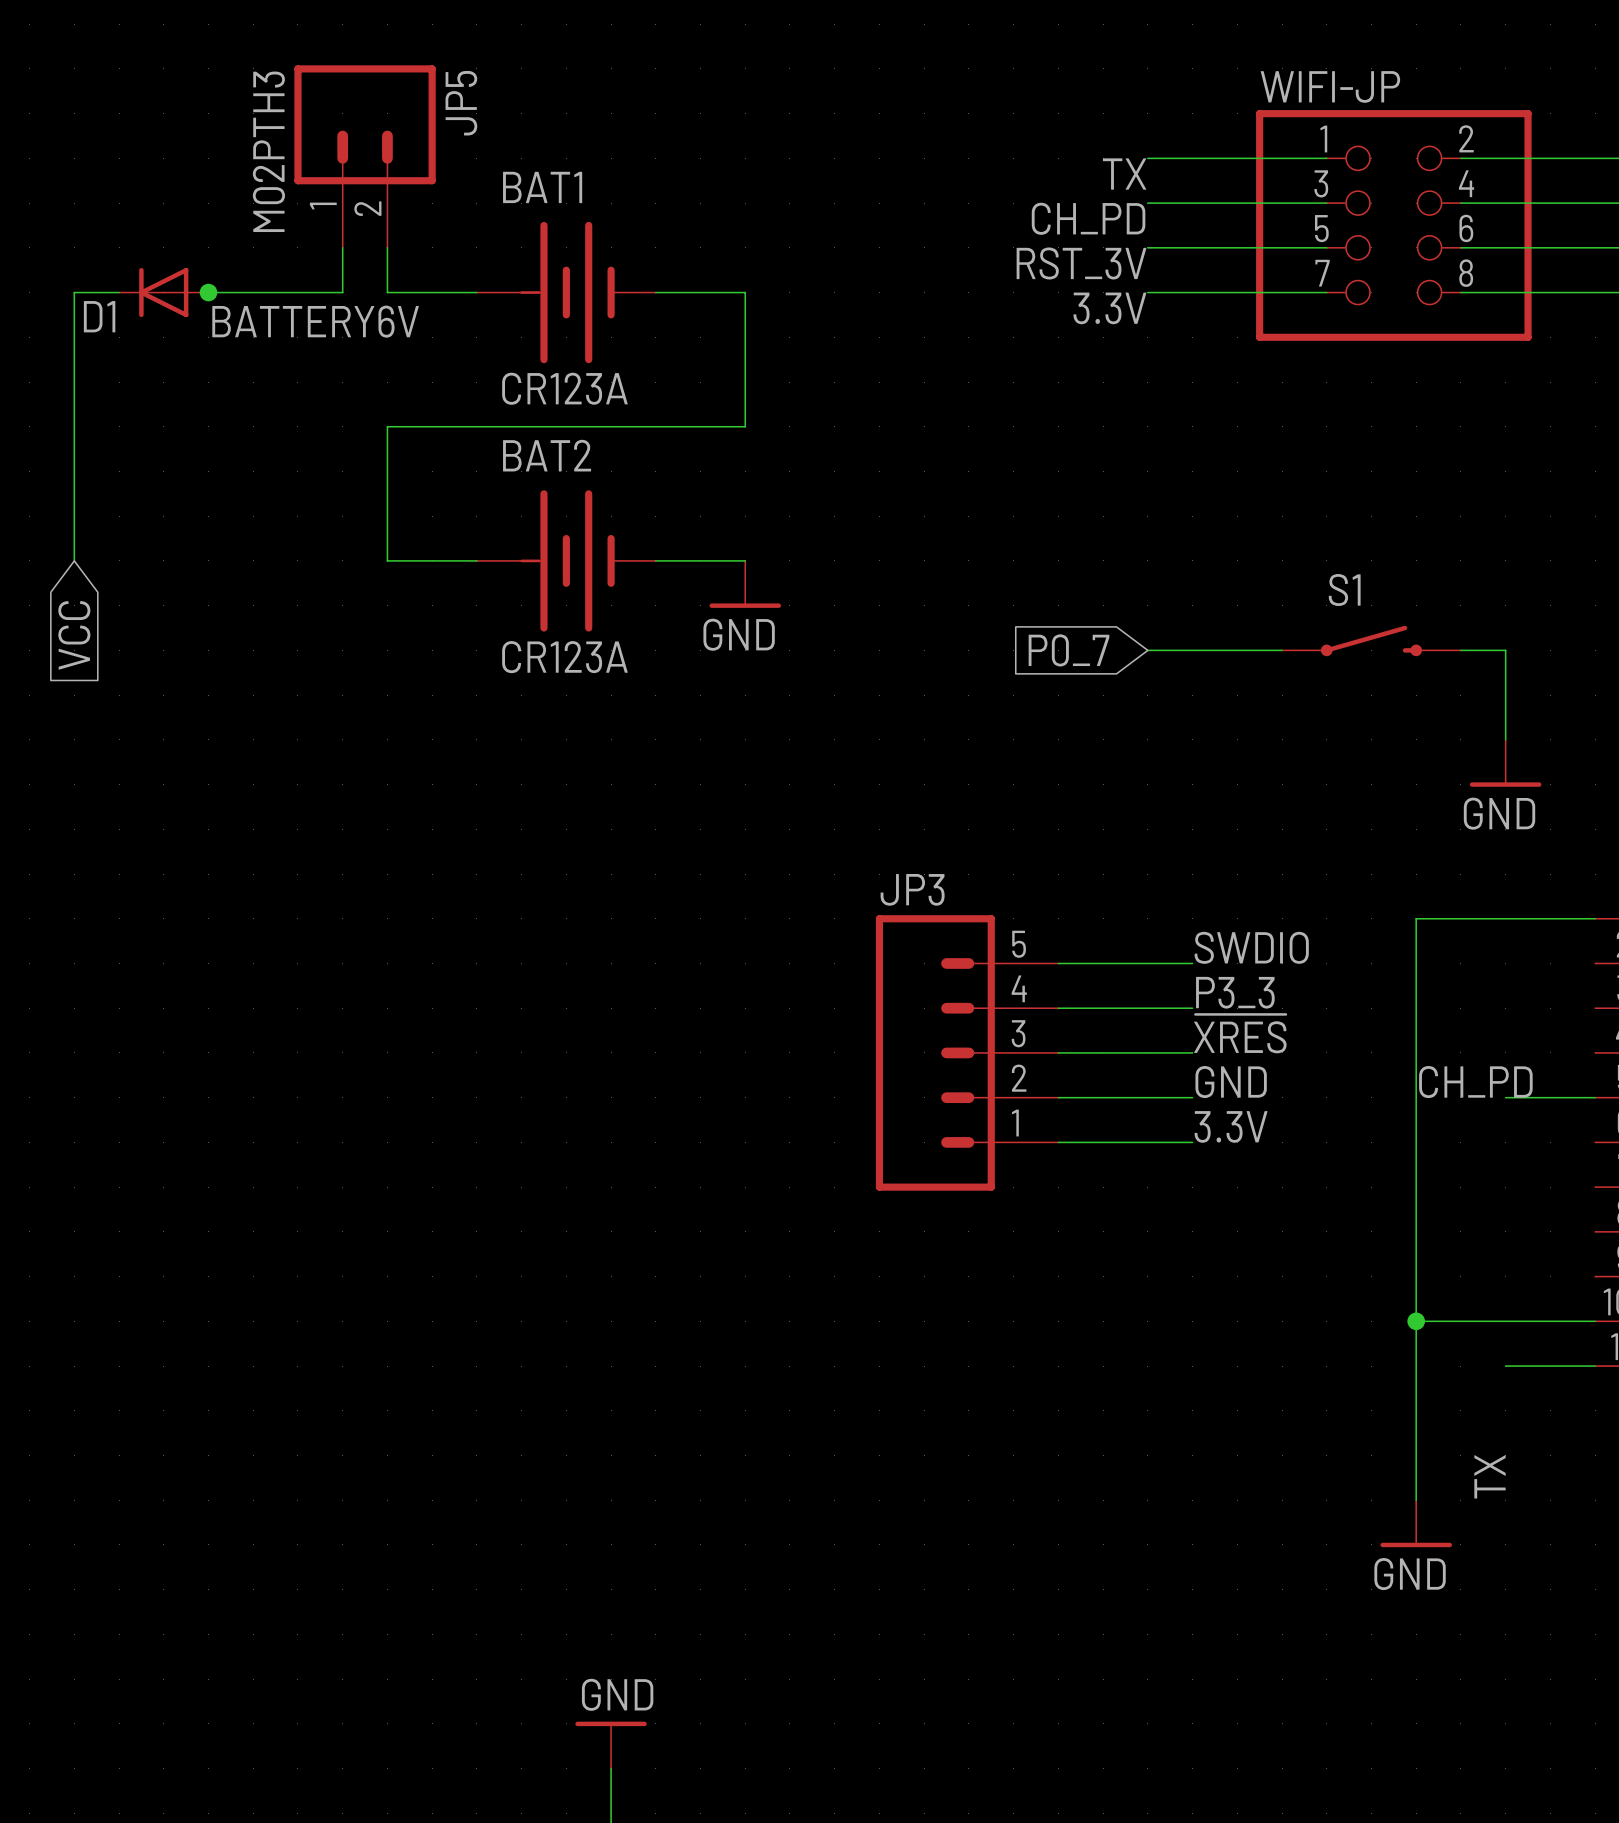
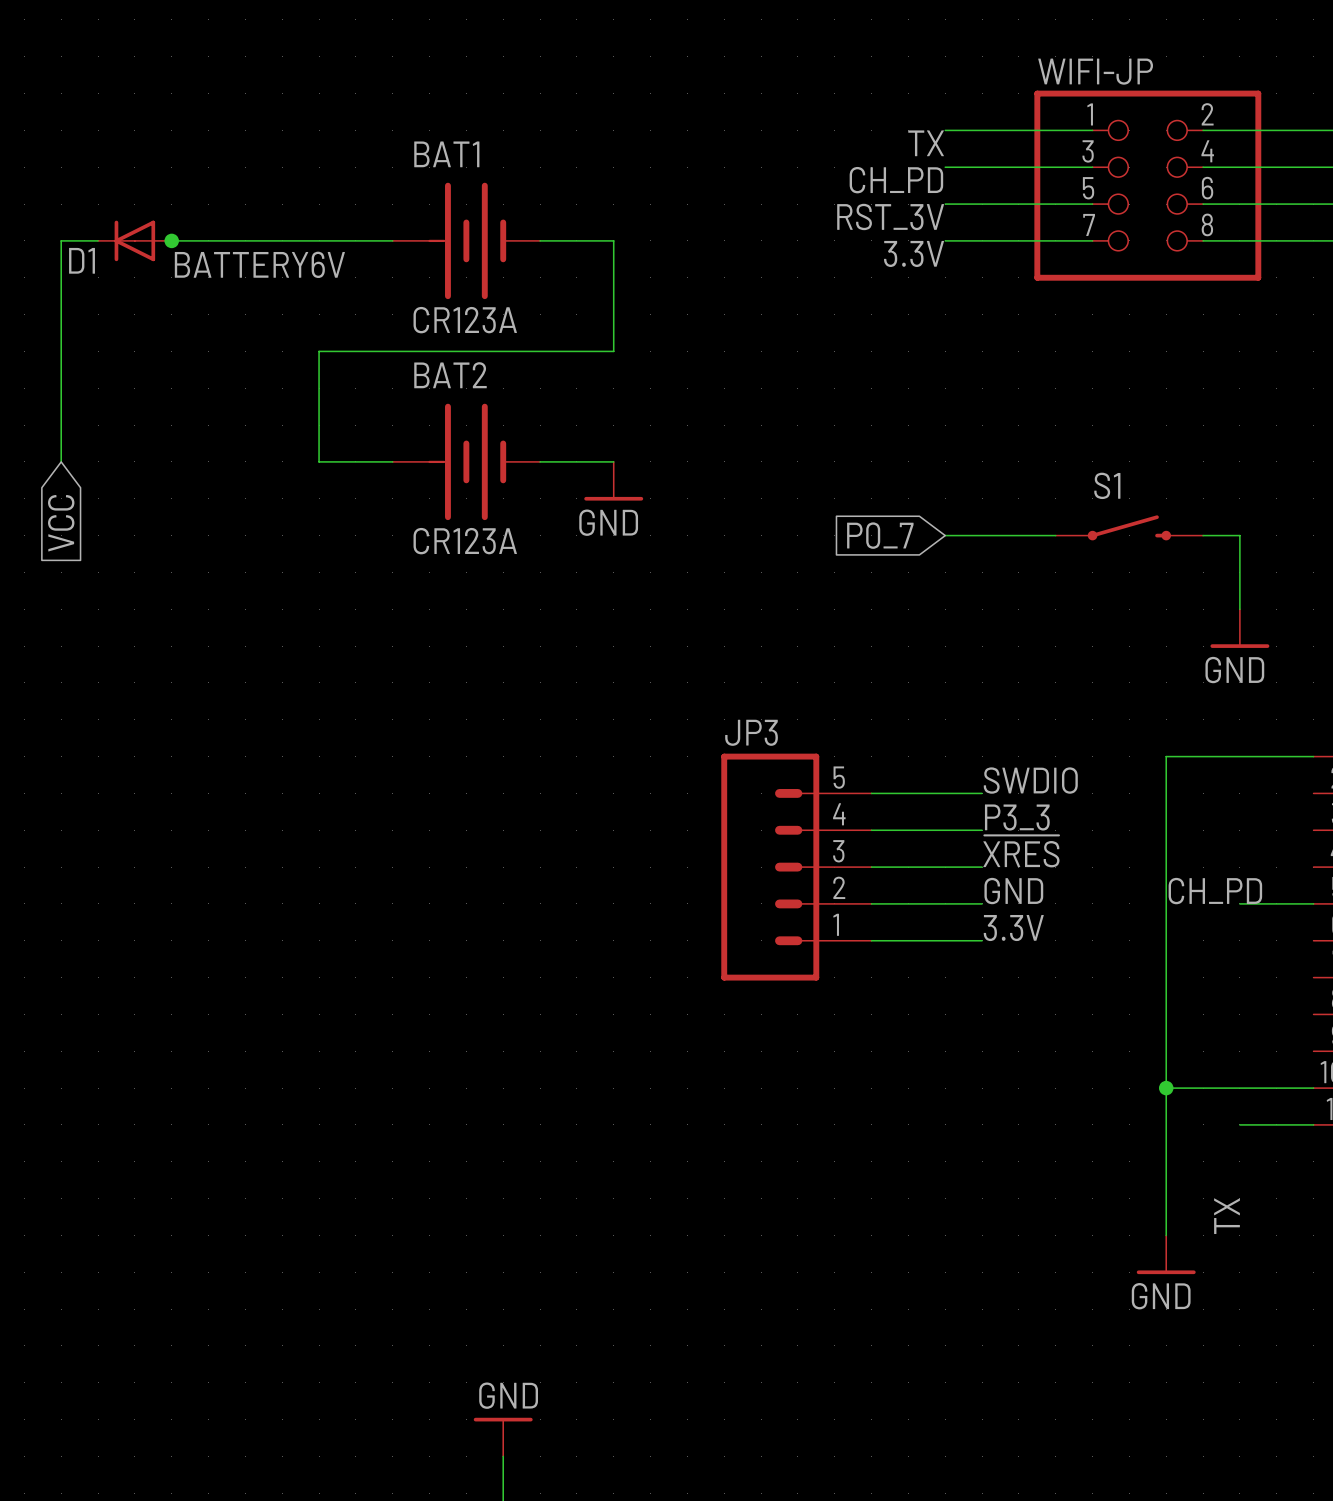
JP5: M02PTH3 (365, 156) -> none
wire: (342, 247) (342, 292) -> (319, 240) (282, 240)
wire: (387, 247) (387, 292) -> none

